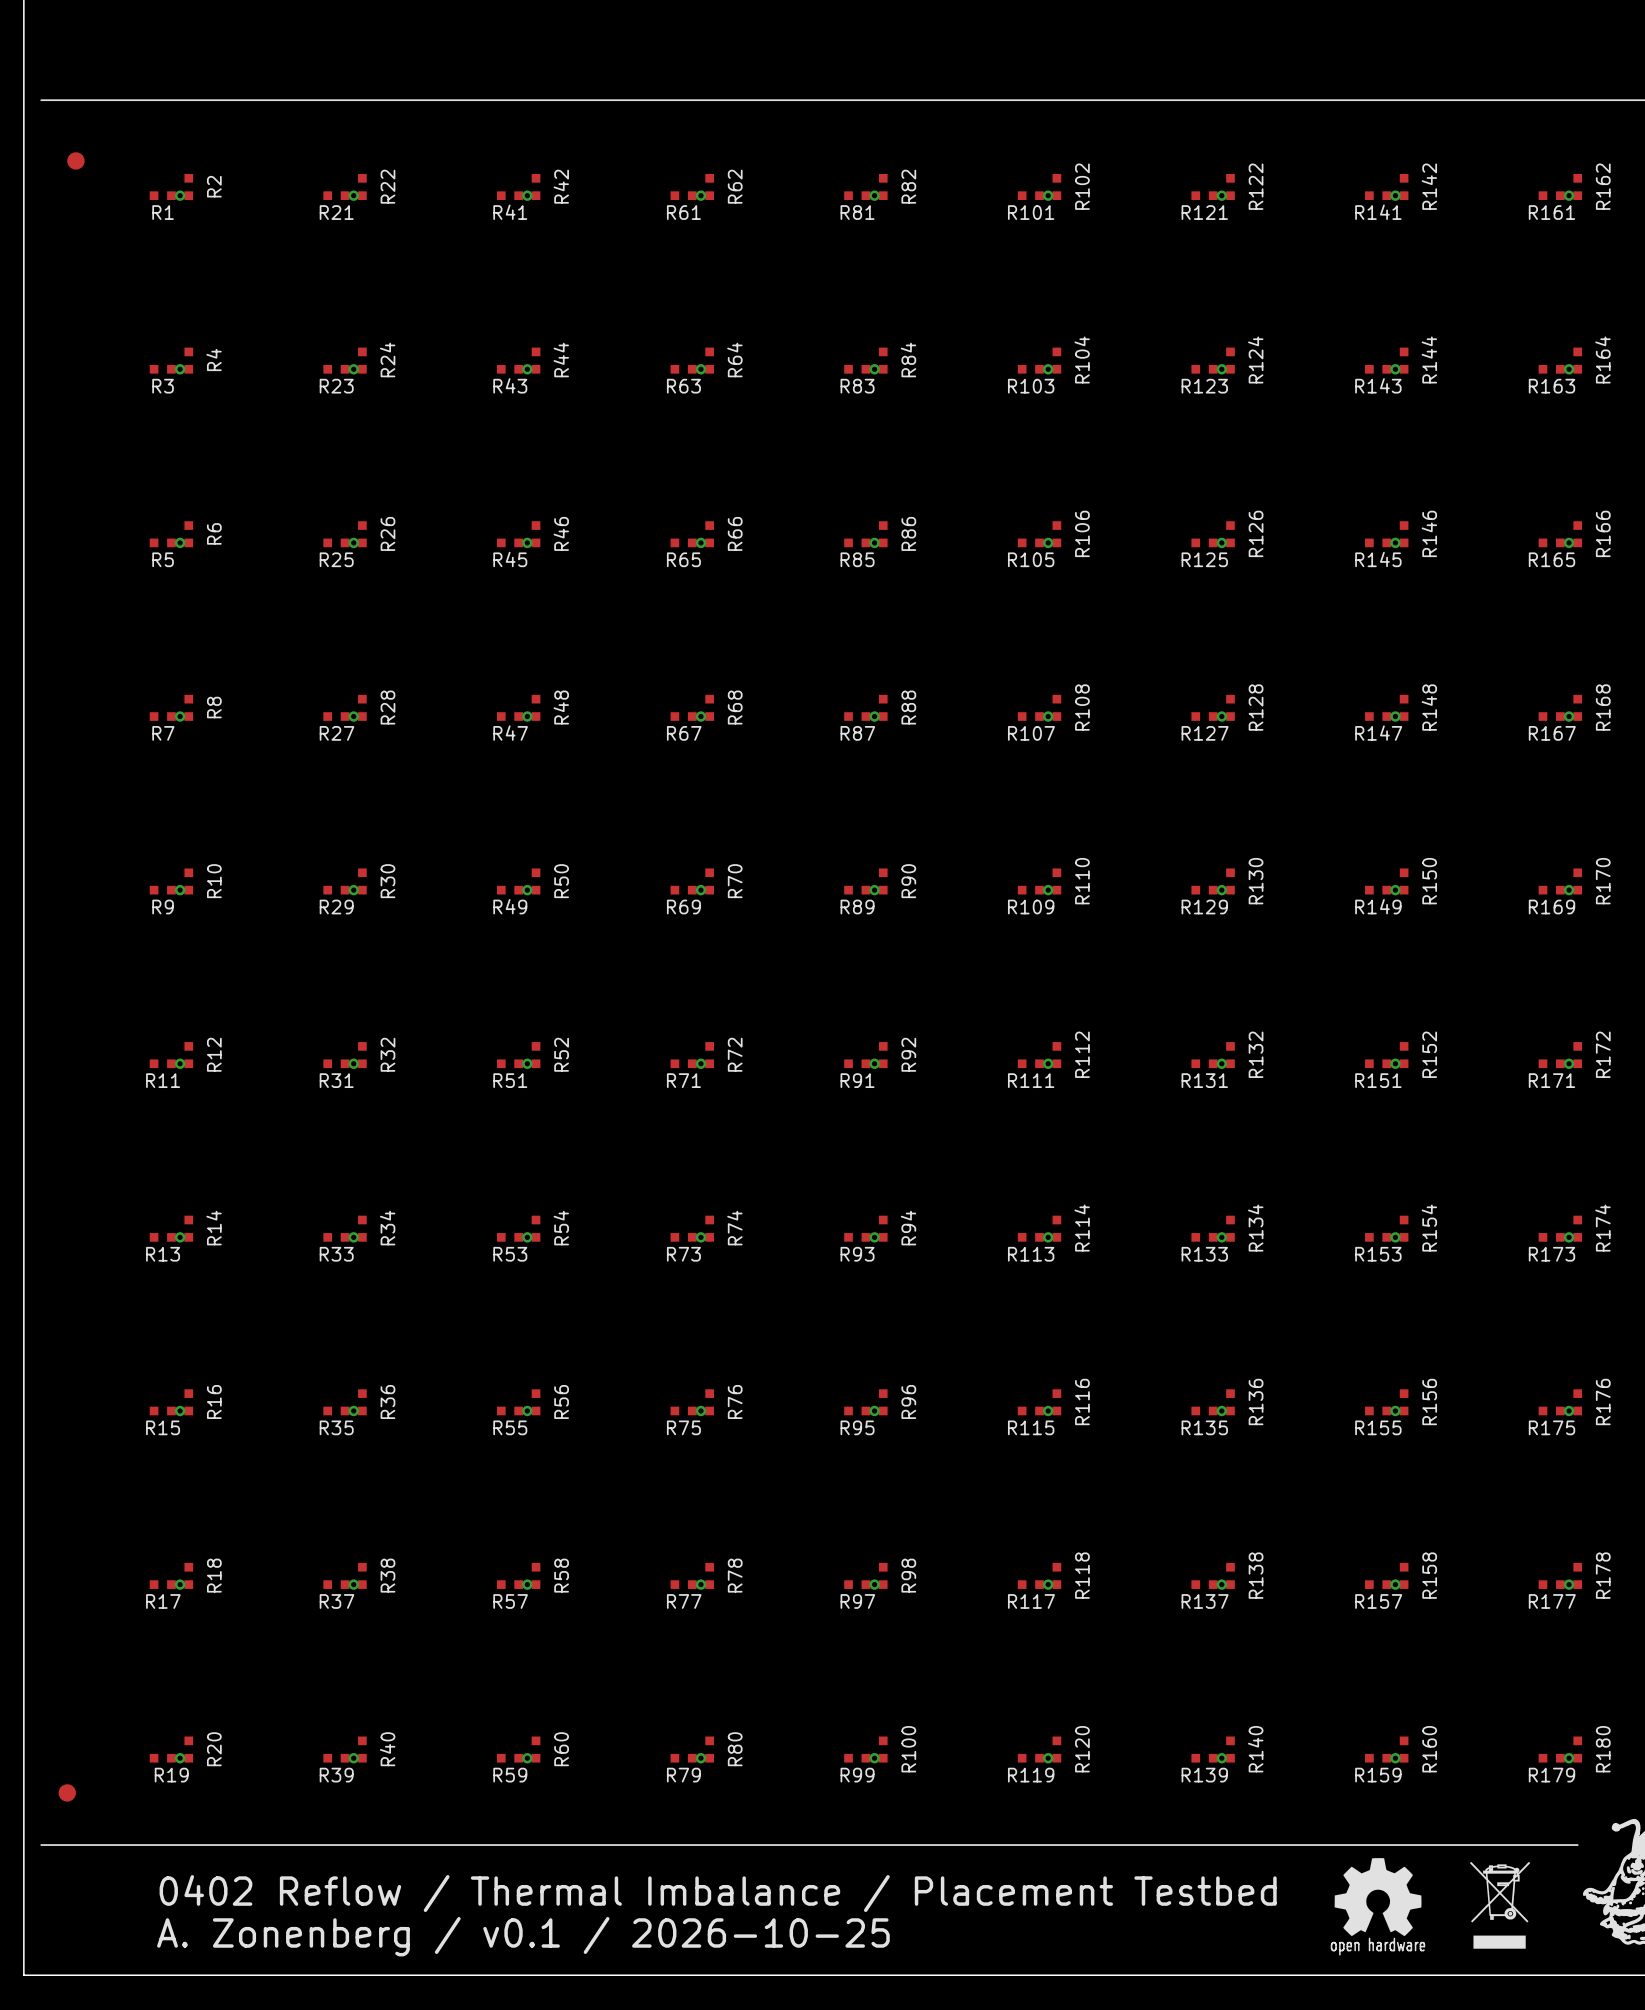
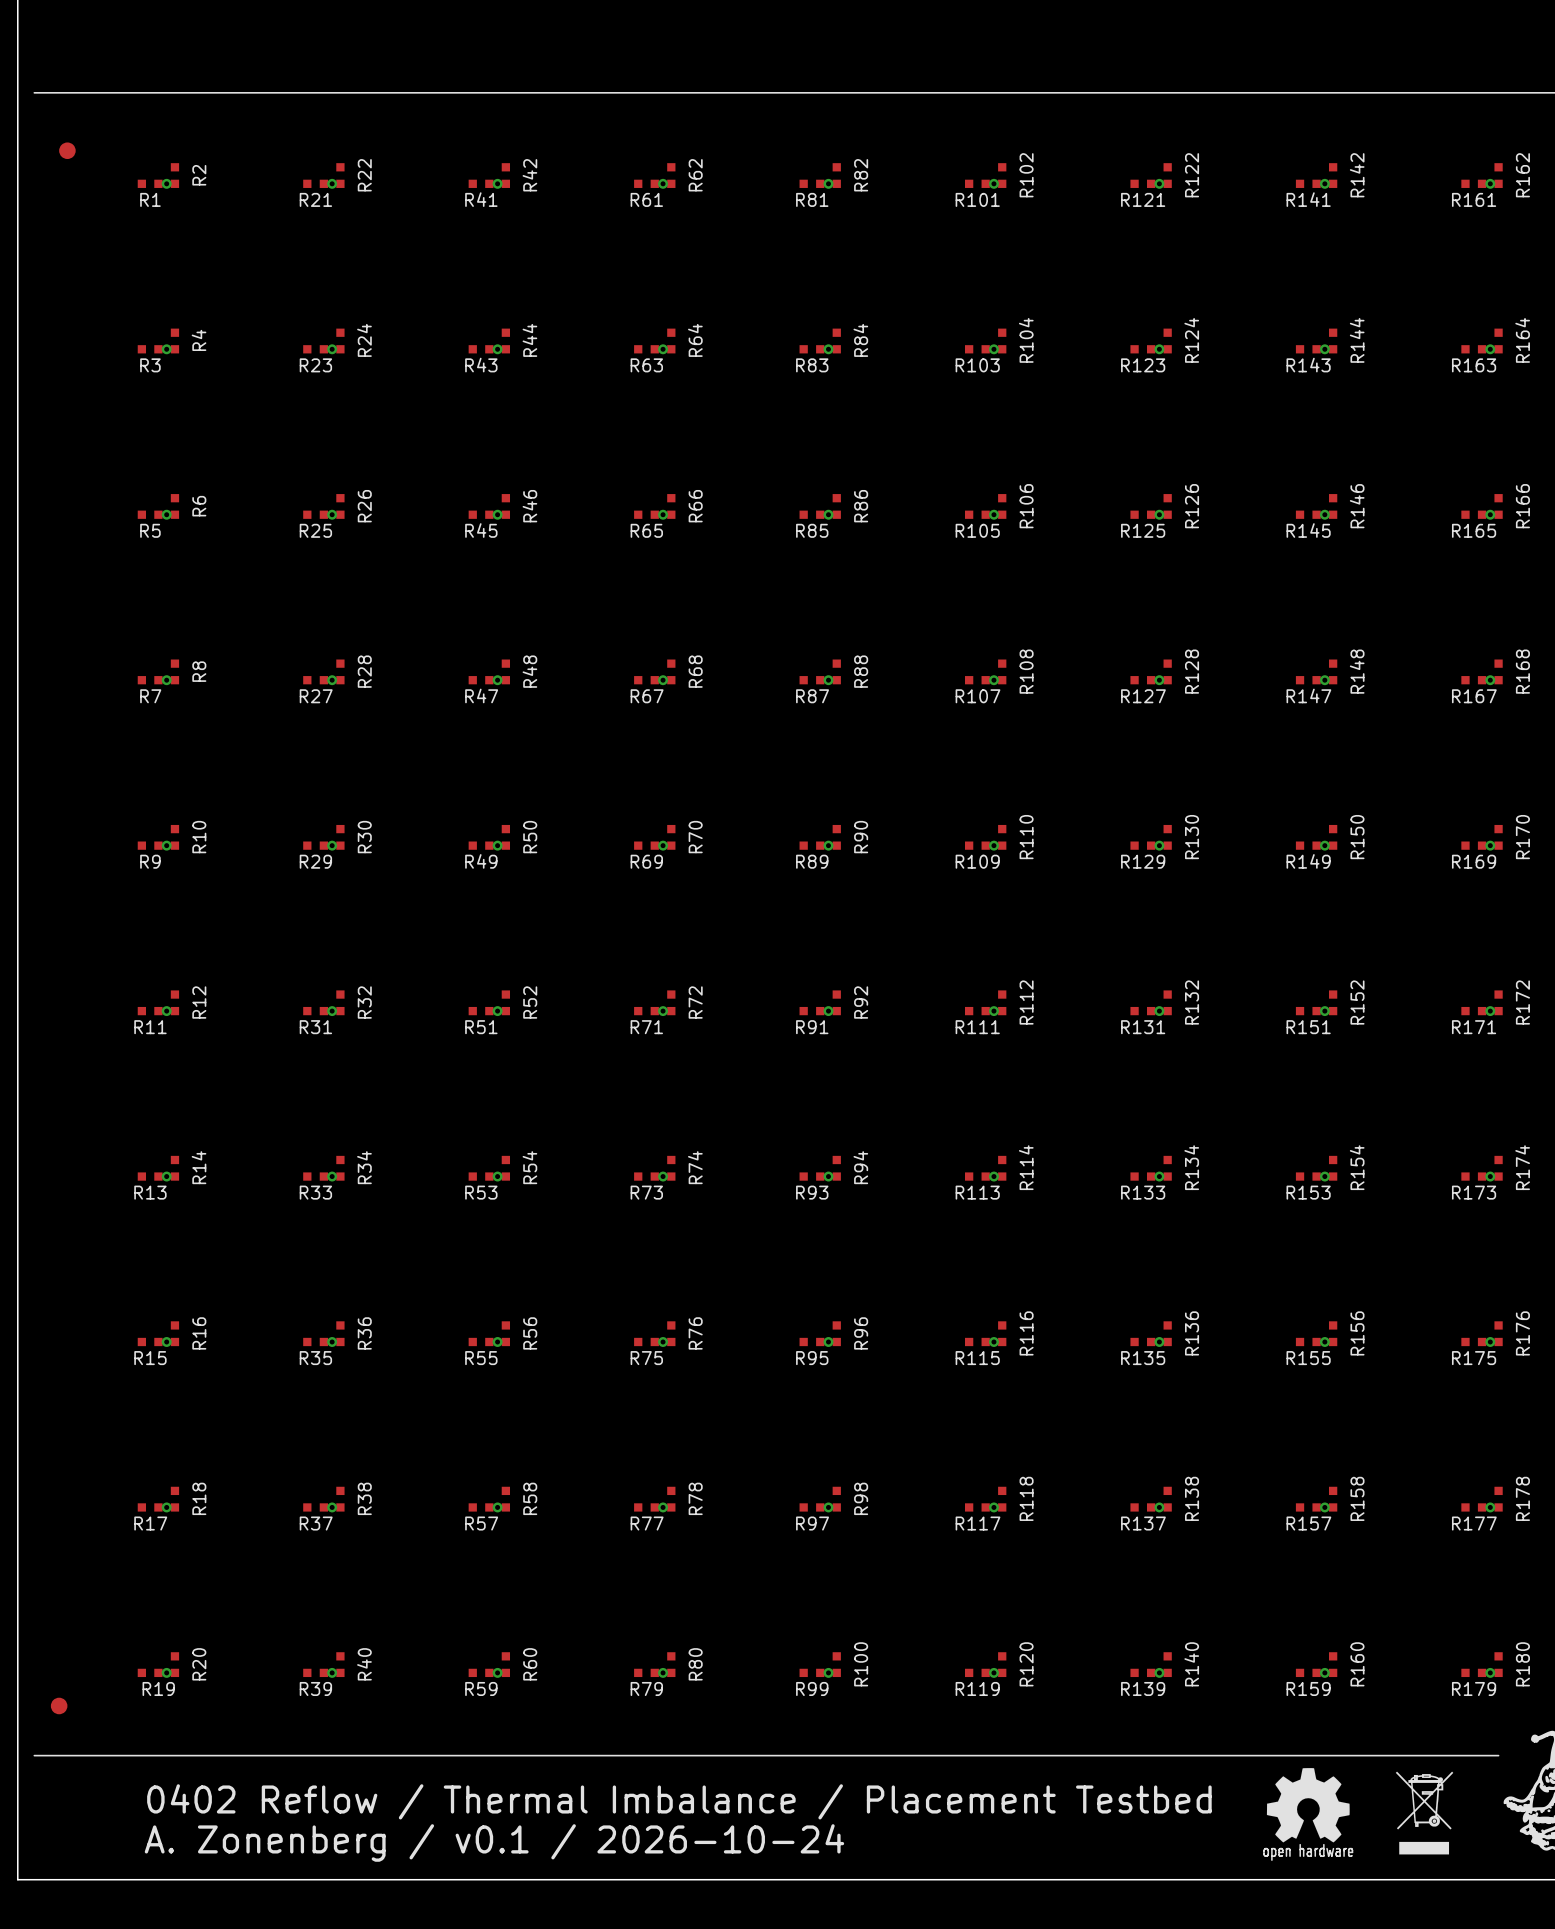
text: A. Zonenberg / v0.1 / 2026-10-25 (523, 1936) -> A. Zonenberg / v0.1 / 2026-10-24 (494, 1842)

